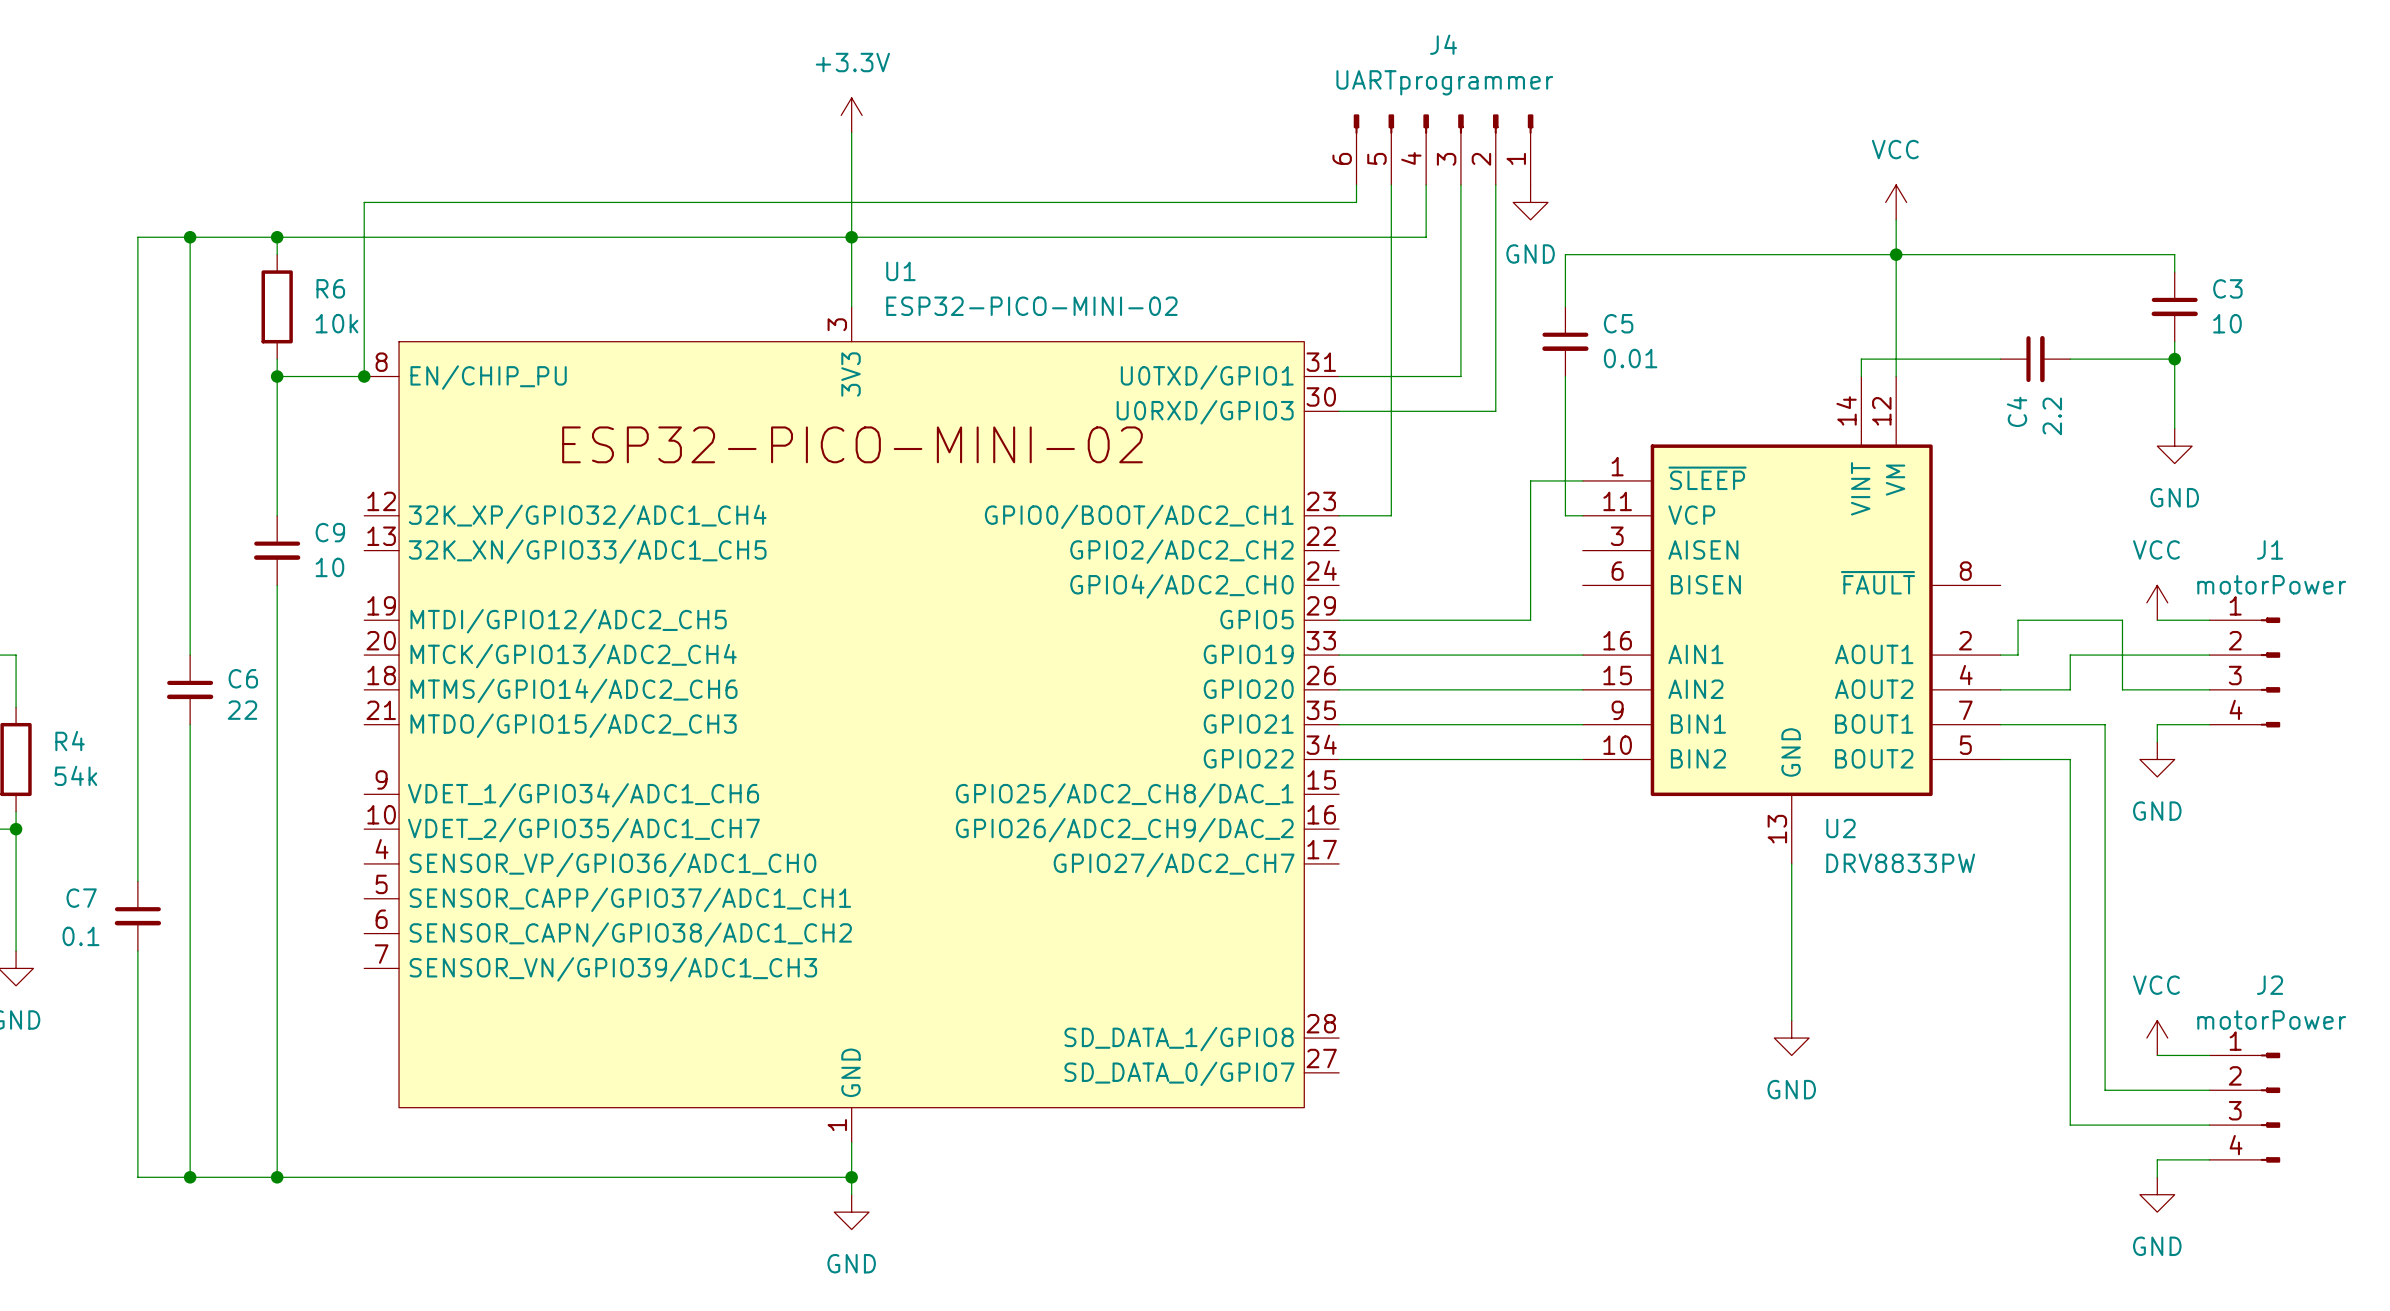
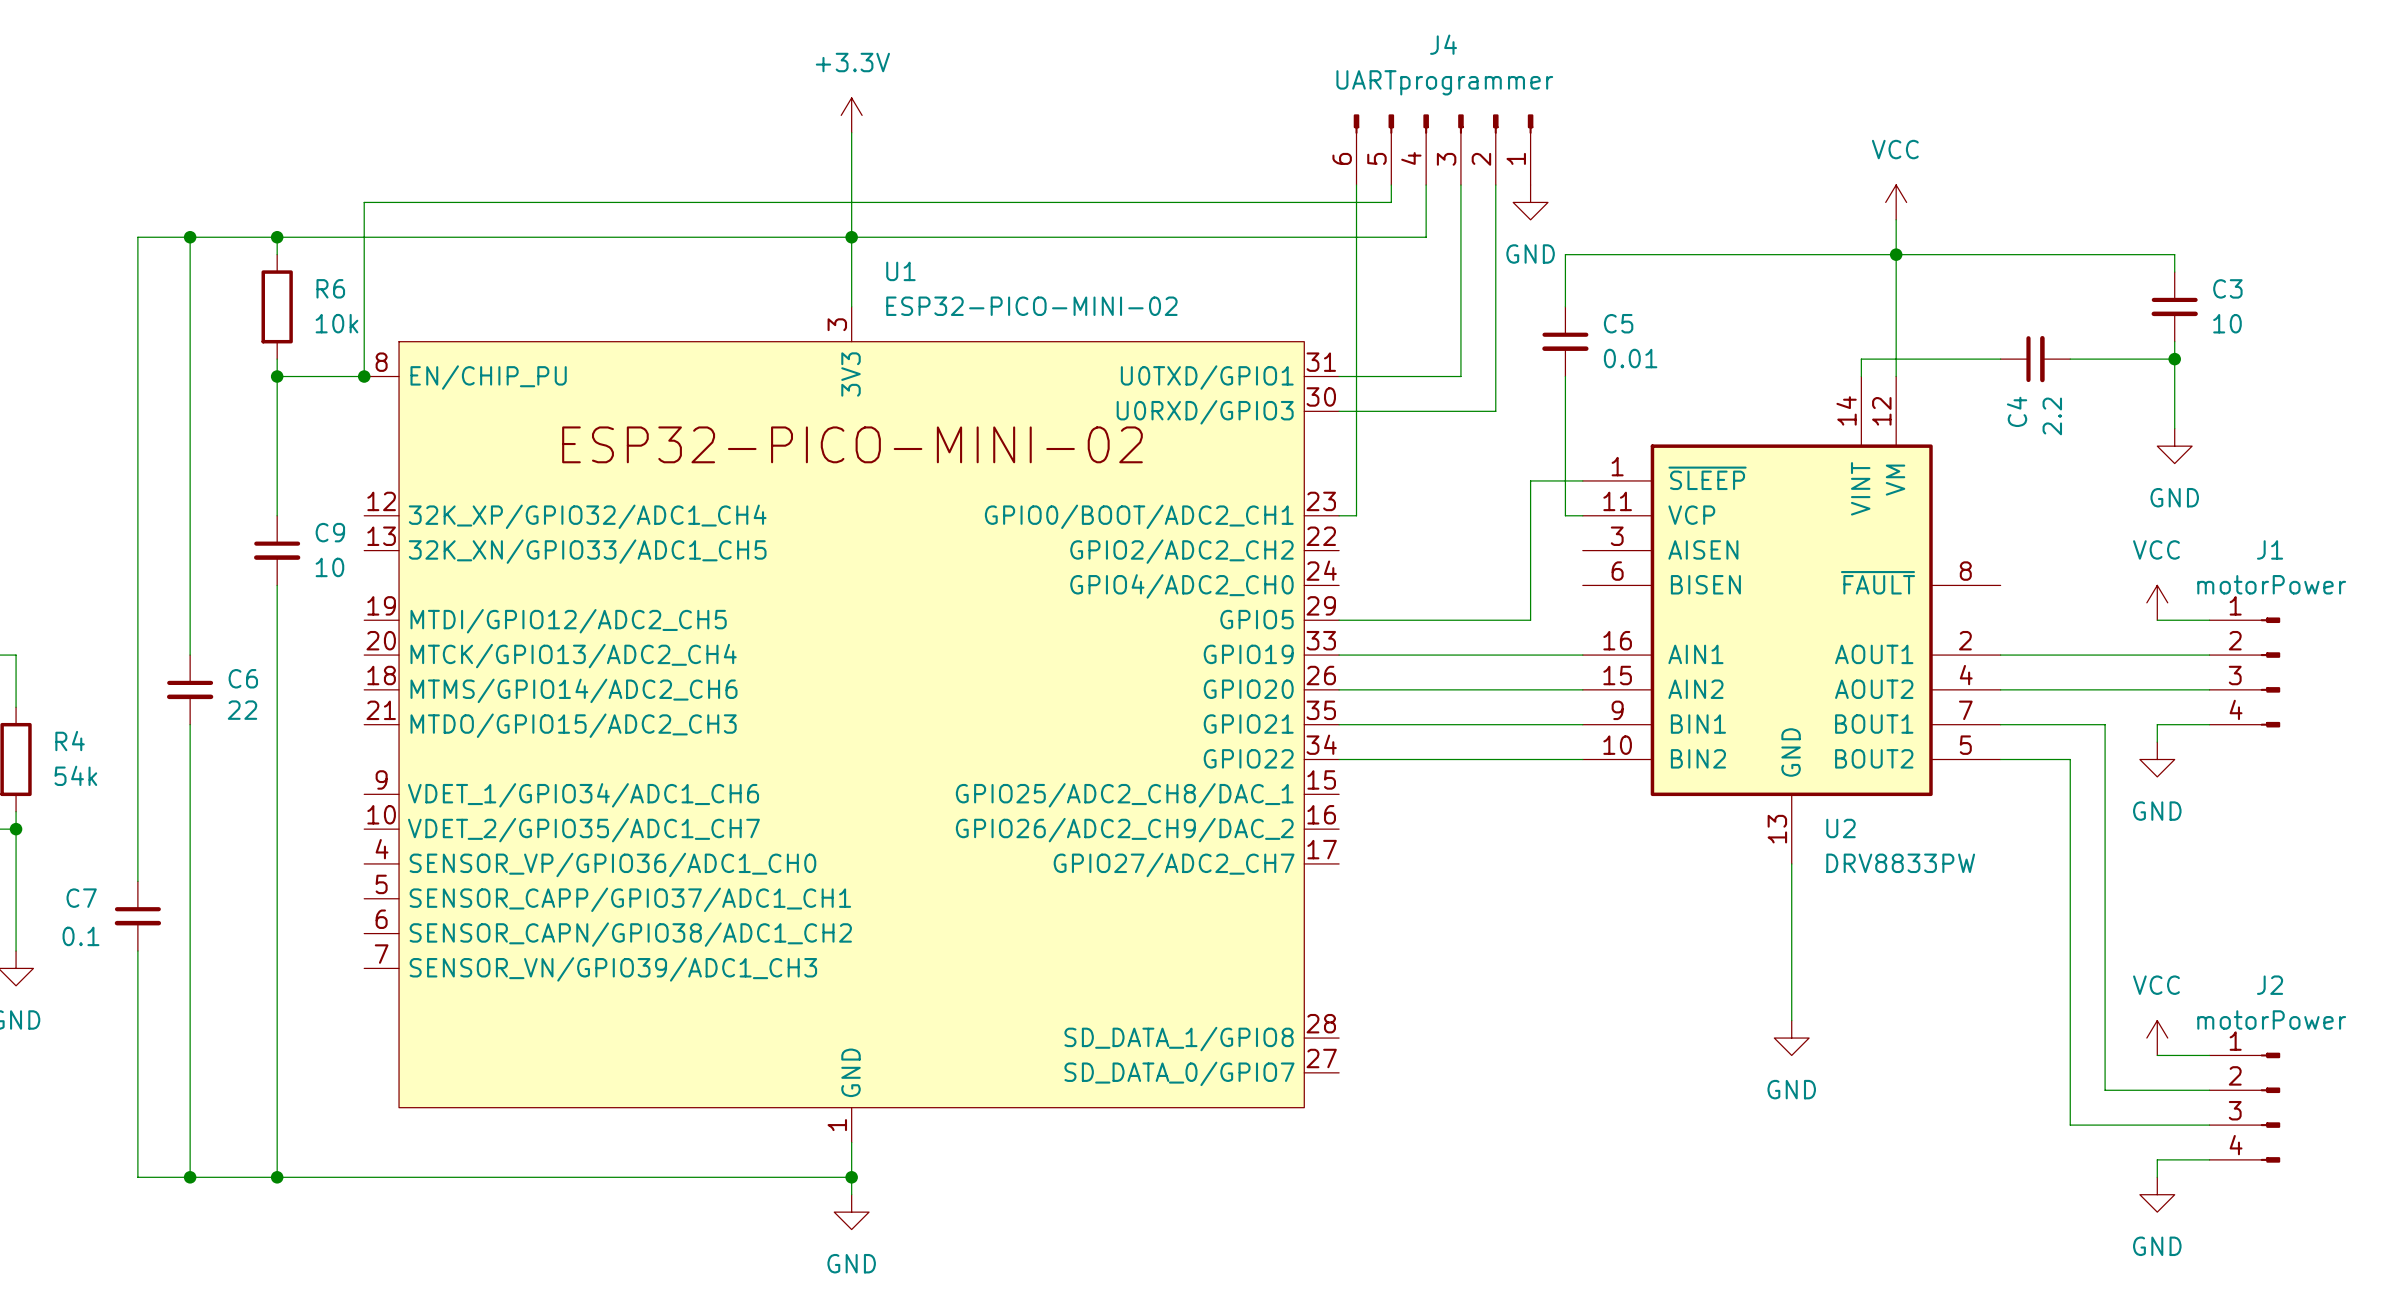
wire: (1391, 202) (1391, 515) (1356, 515) -> (1391, 202) (1356, 202) (1356, 515)
wire: (2018, 655) (2018, 620) (2122, 620) (2122, 689) -> (2018, 655) (2070, 655)
wire: (2070, 655) (2070, 689) -> (2122, 689) (2070, 689)

